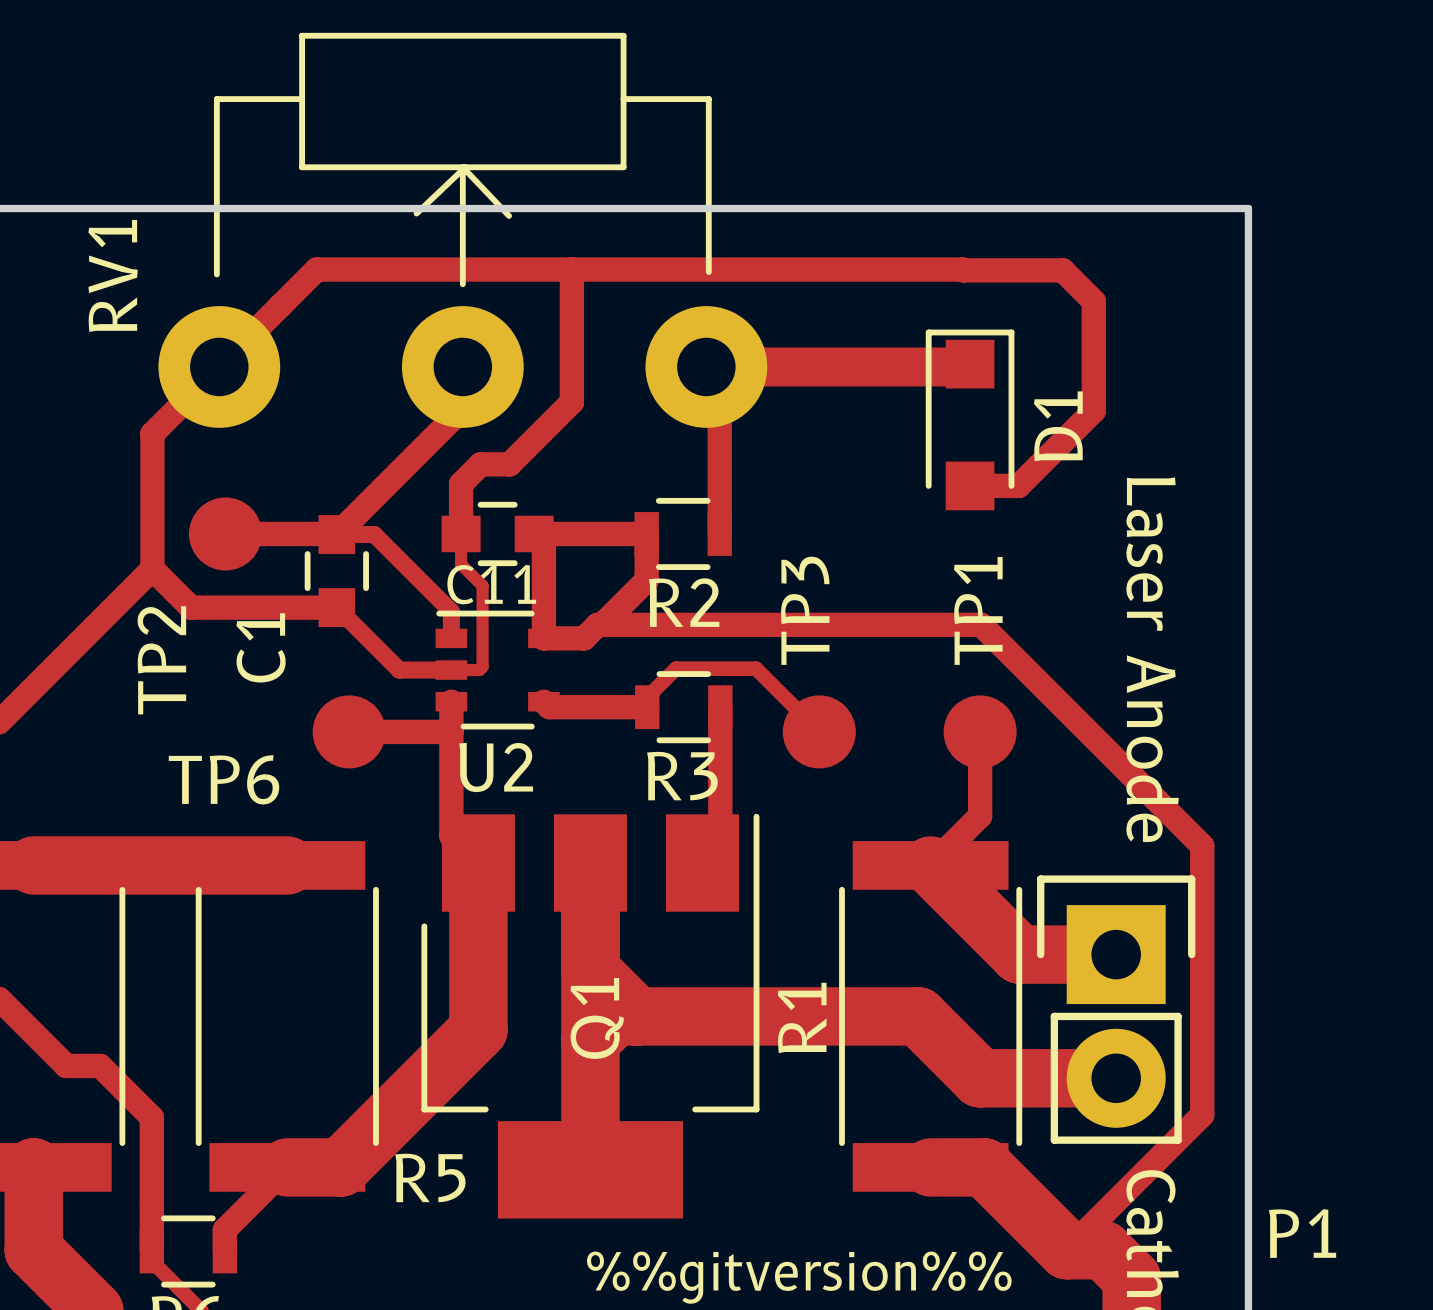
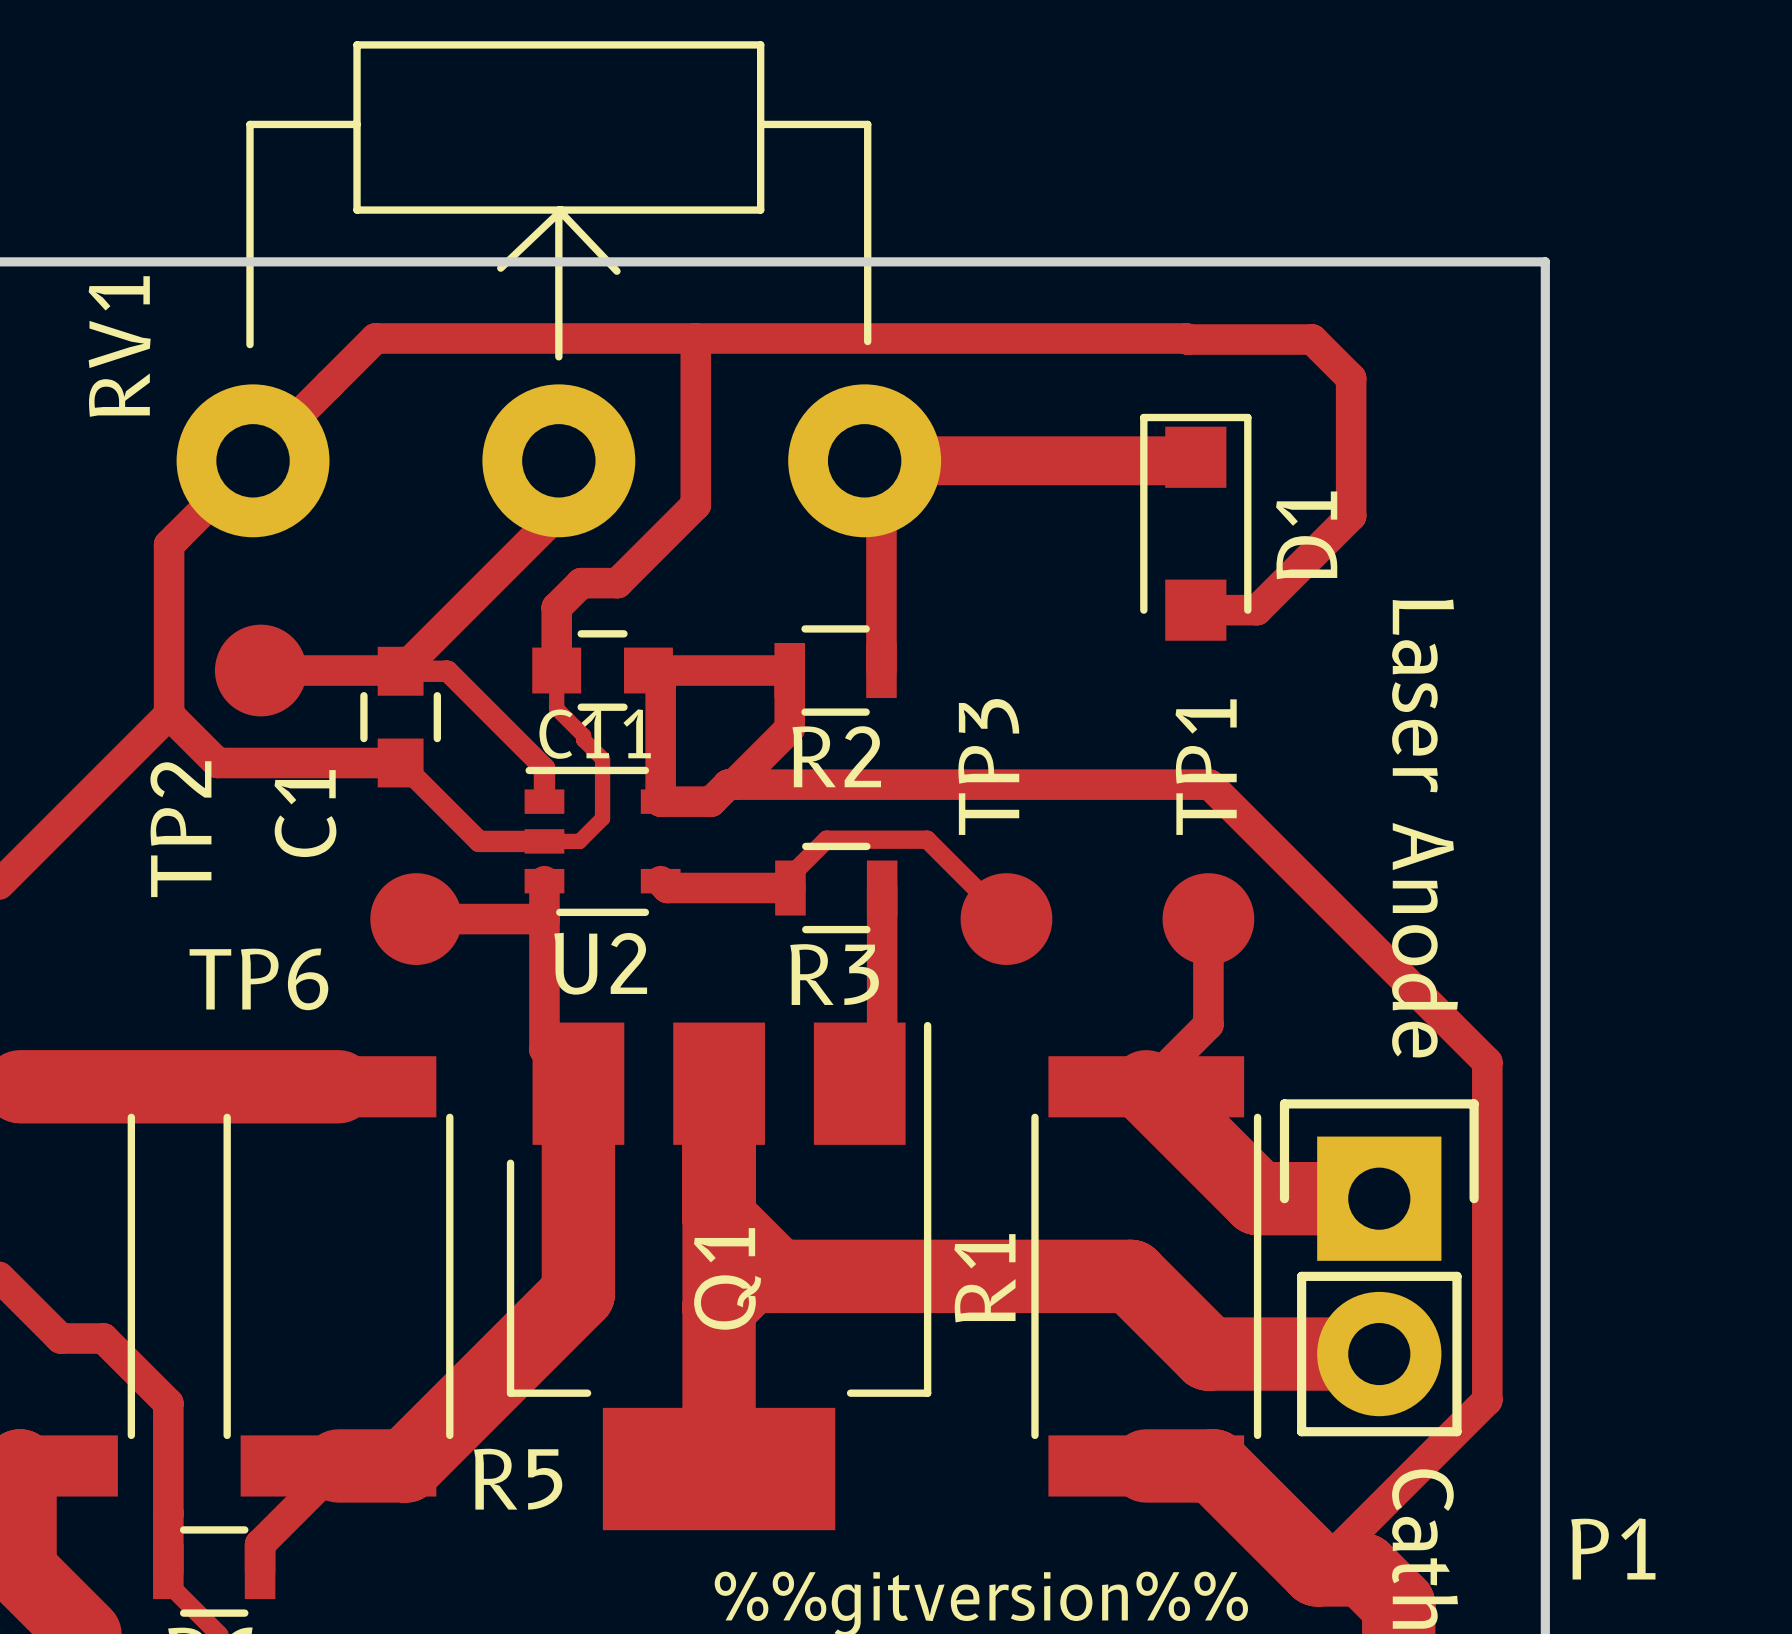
track: (482, 589) (482, 666) -> (583, 739) (602, 758) (602, 818) (583, 837)

